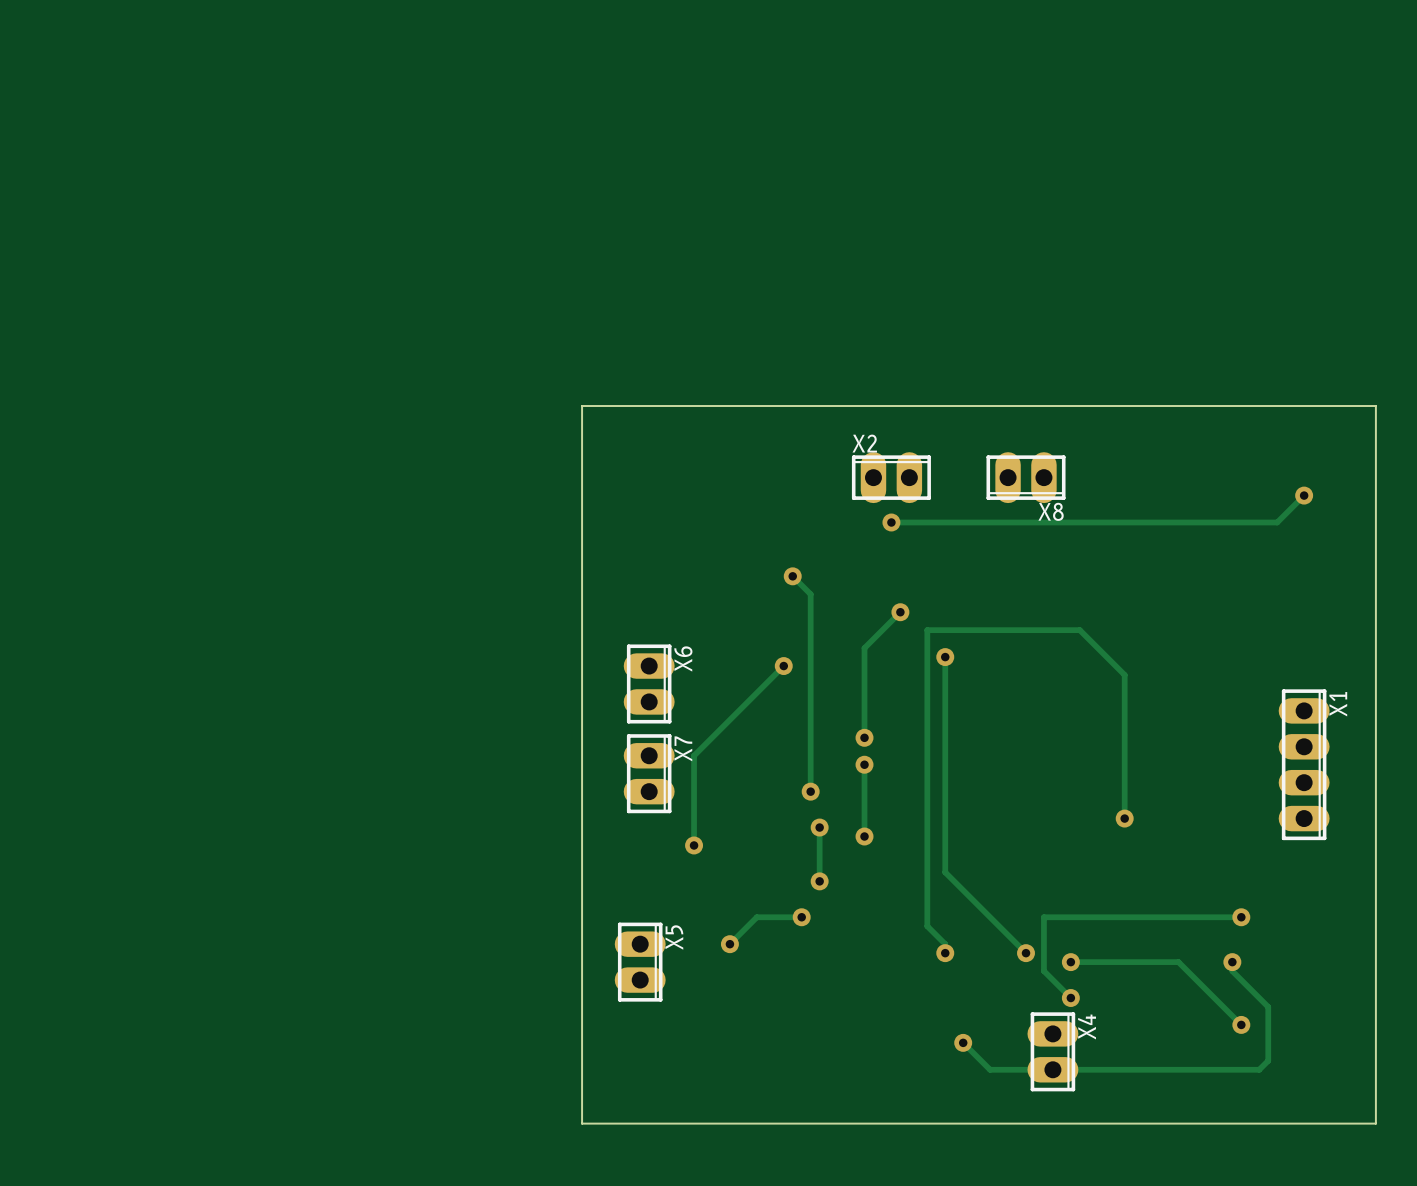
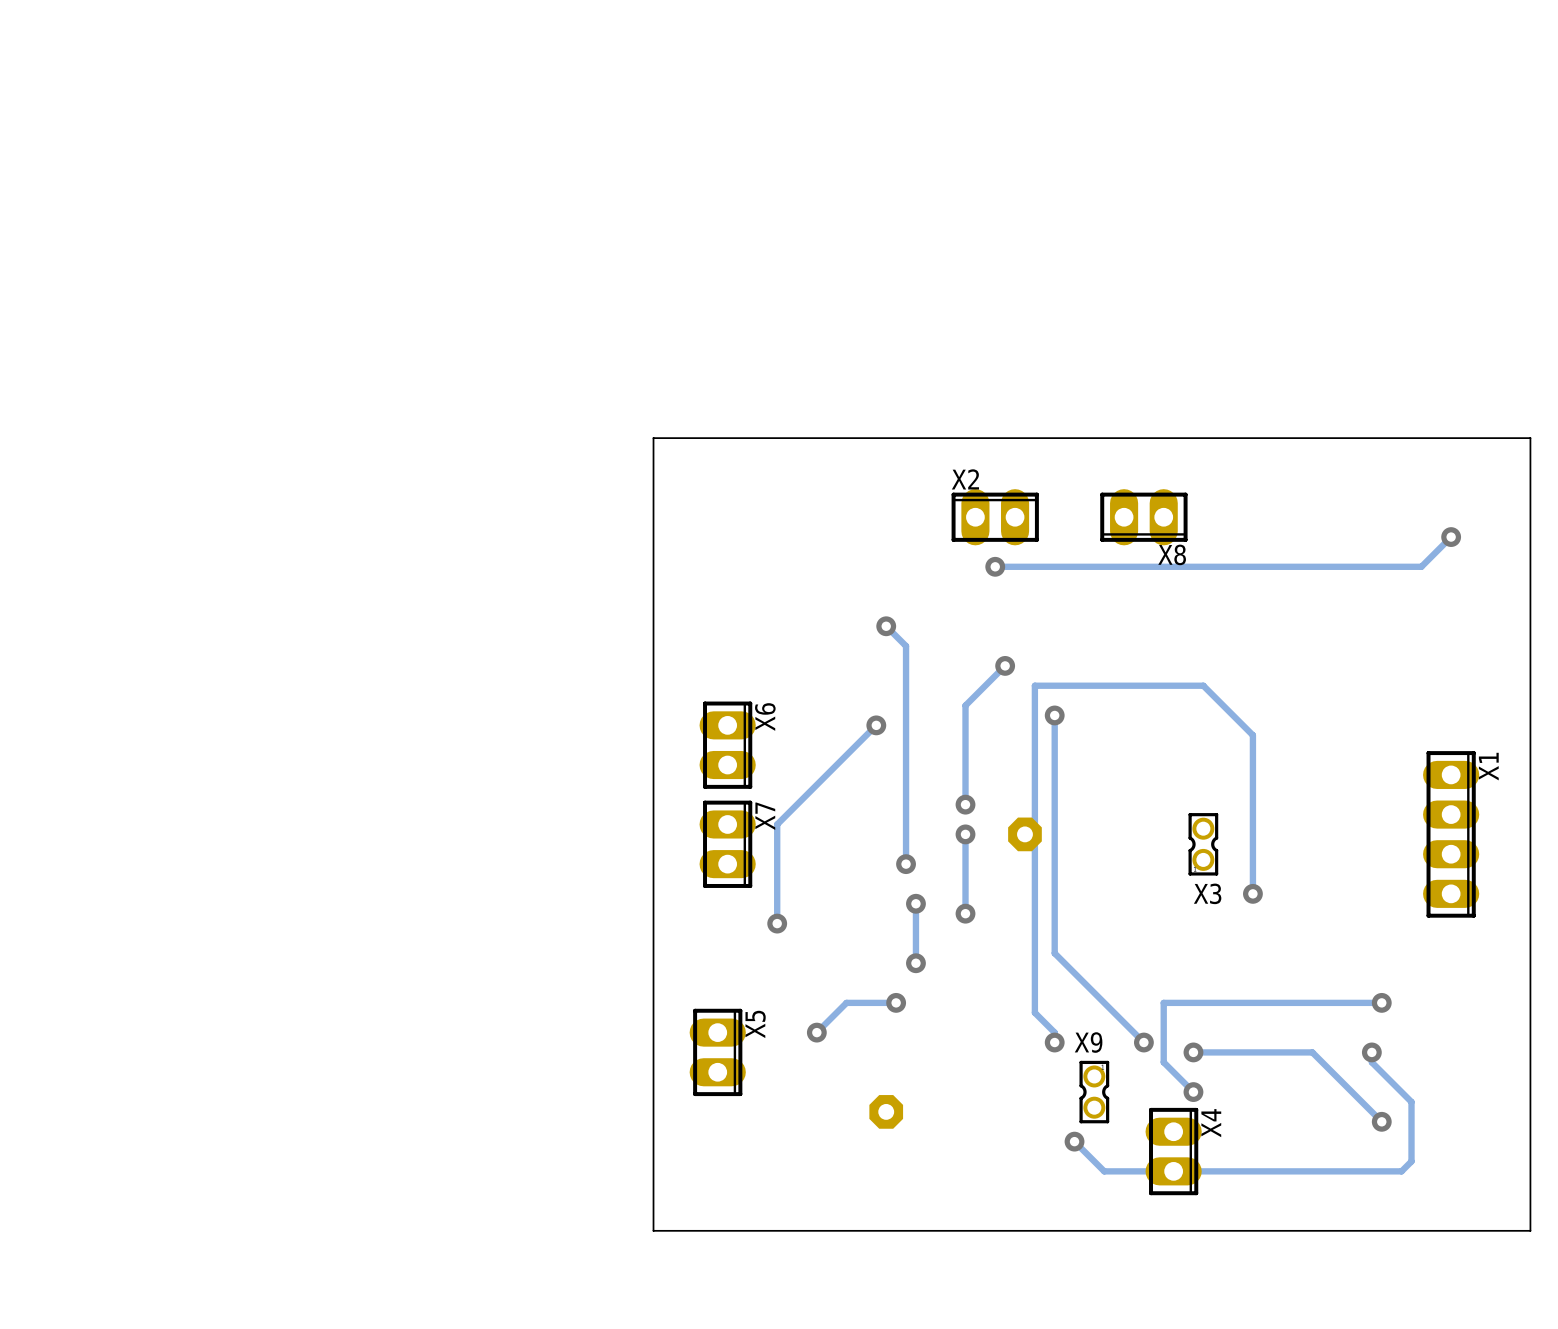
part: none -> (1024, 834)
X3: none -> (1203, 844)
X9: none -> (1094, 1092)
part: none -> (886, 1111)

